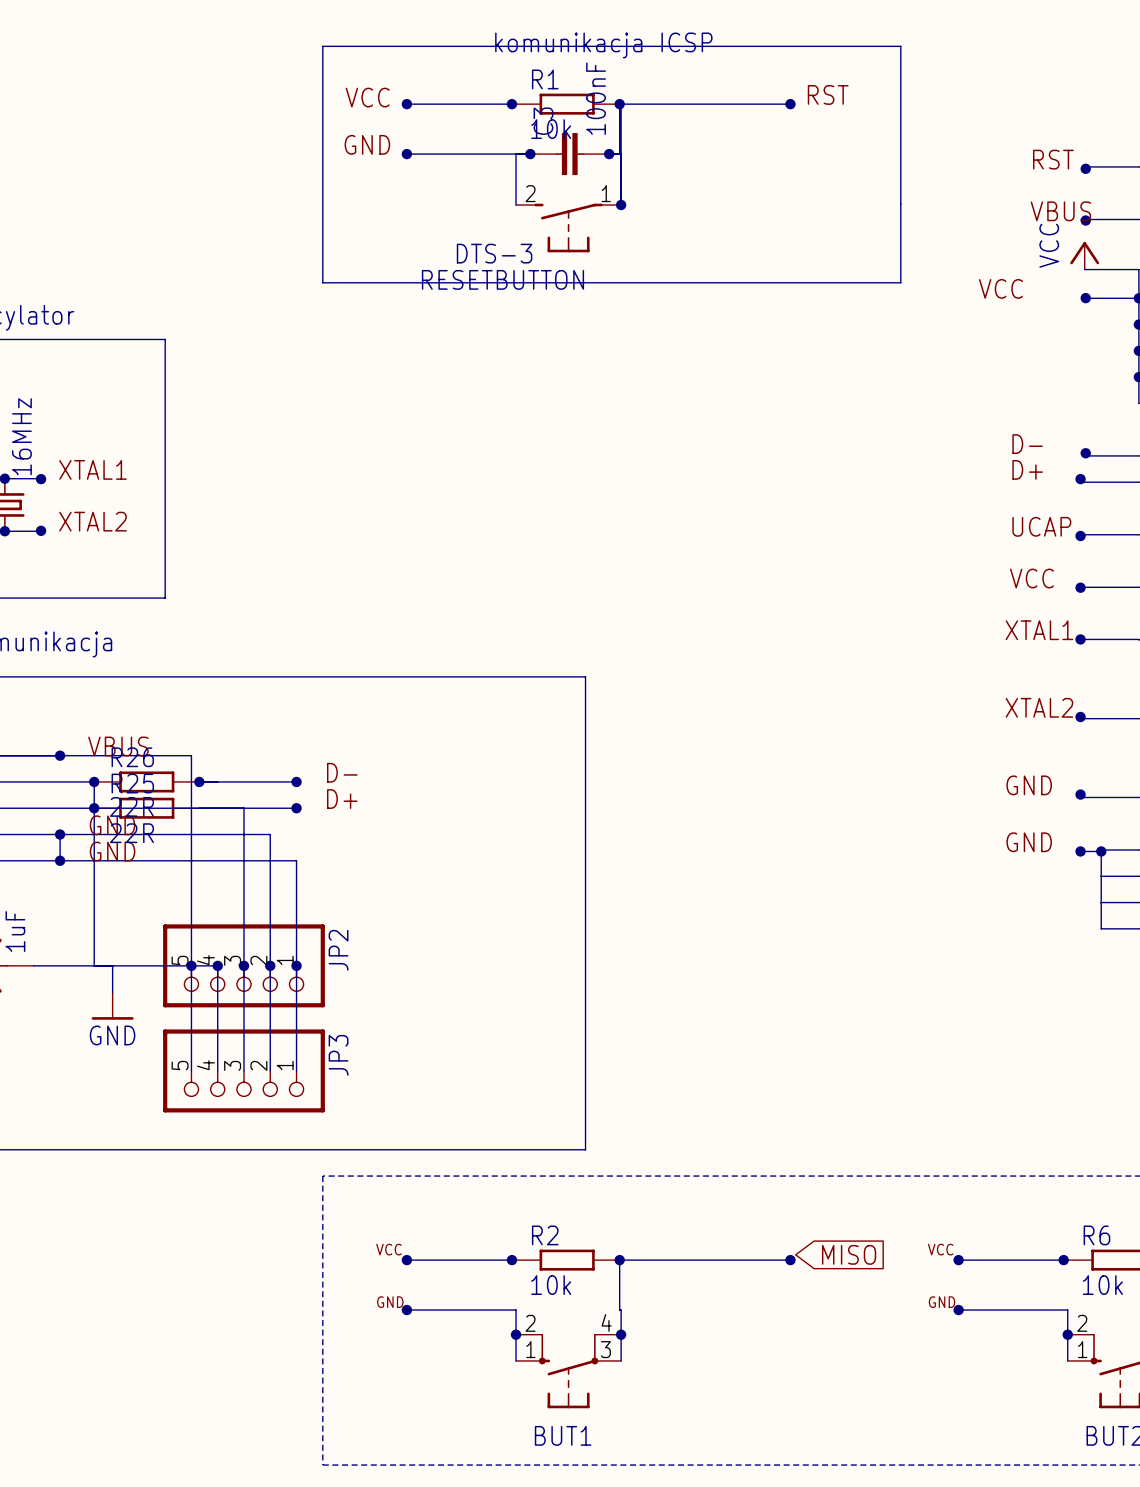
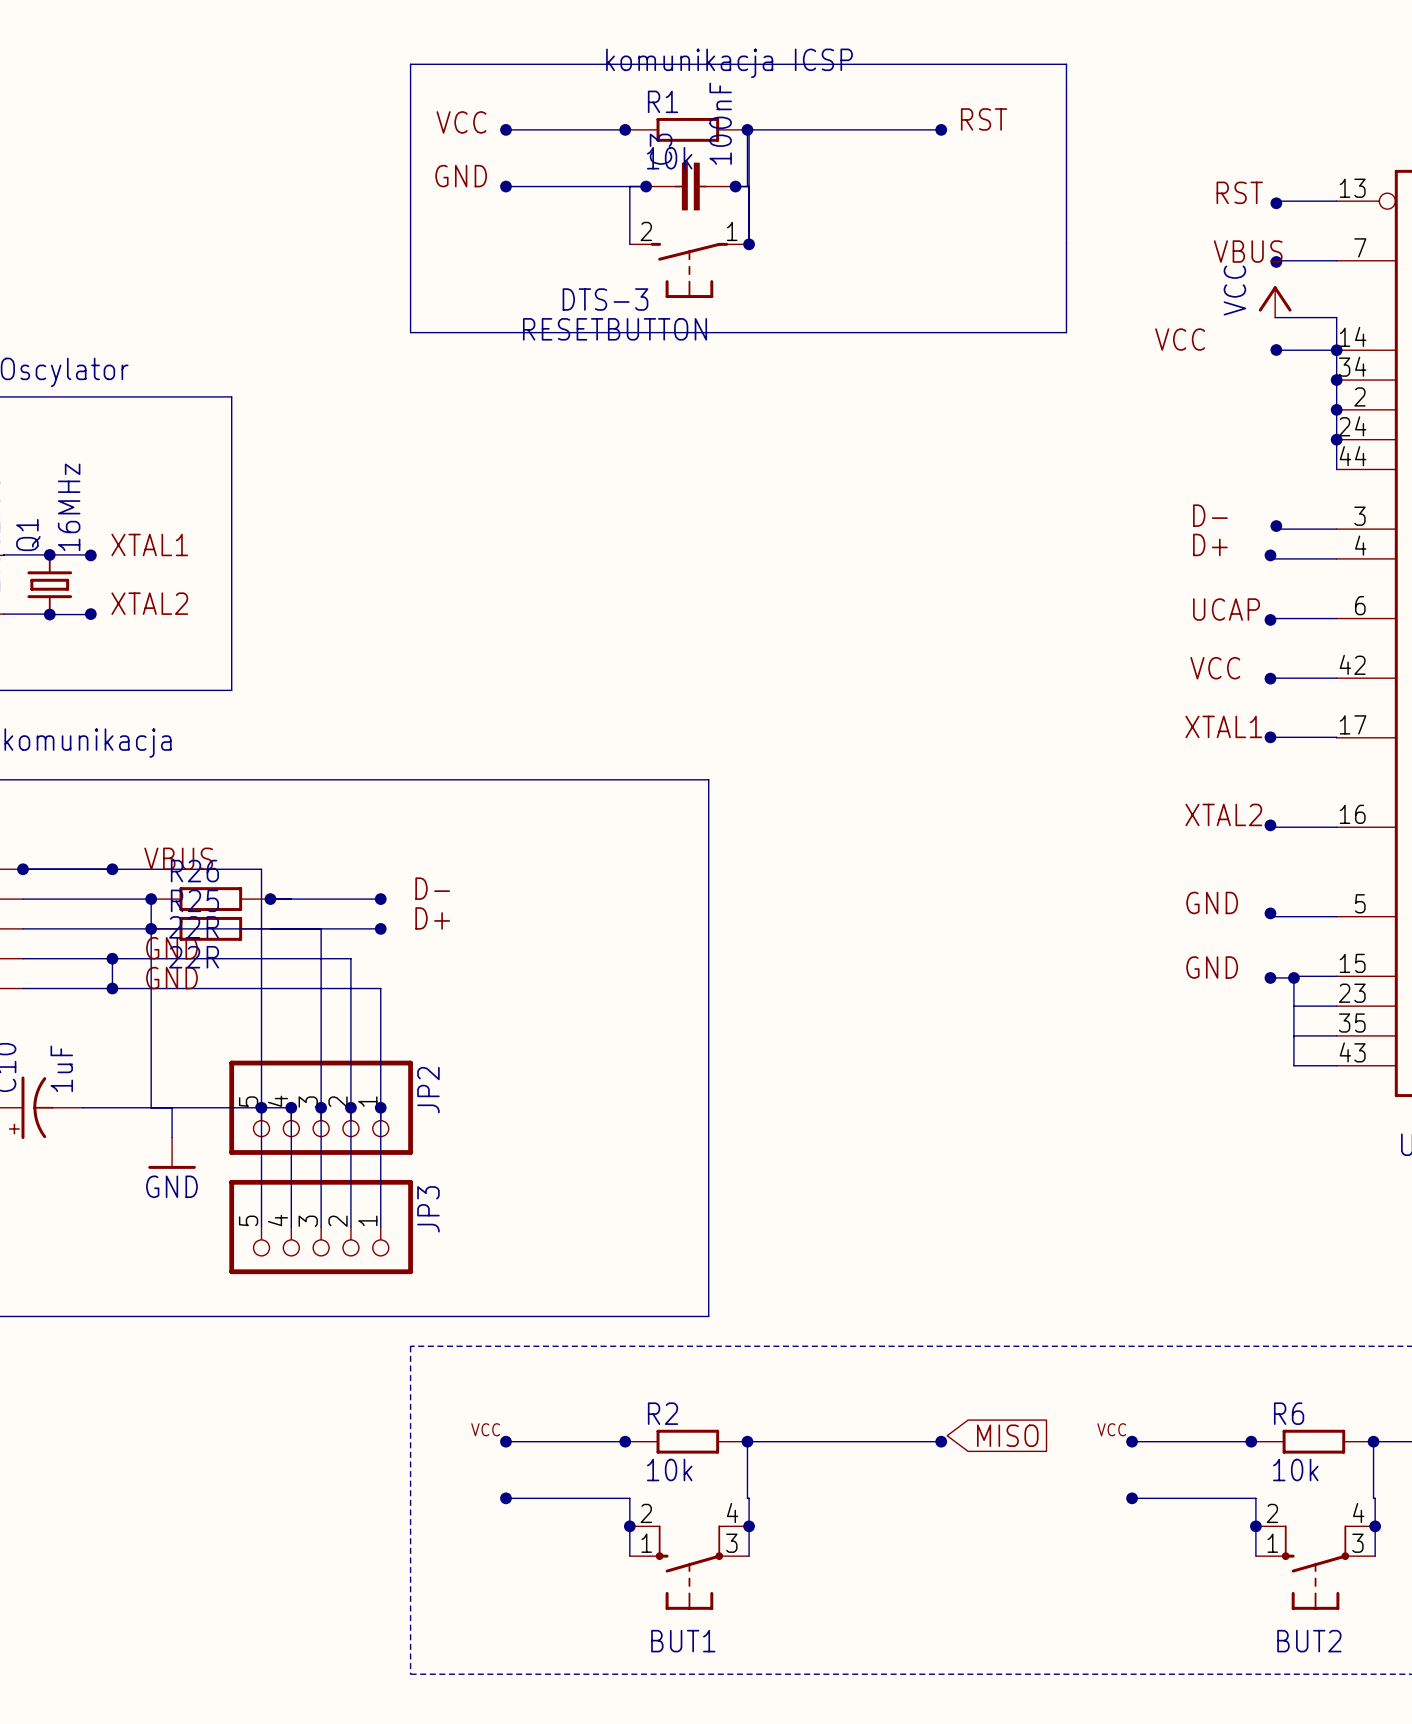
label: GND (390, 1302) -> none
label: GND (942, 1302) -> none

